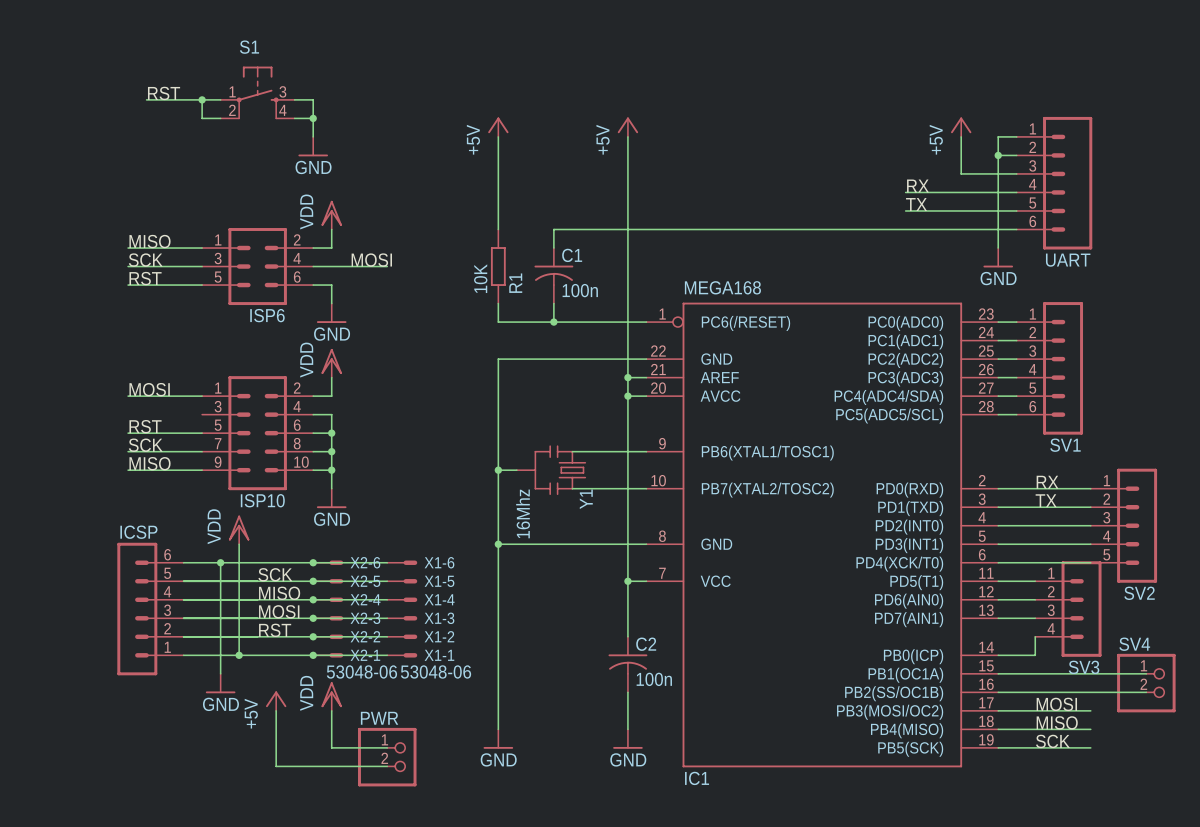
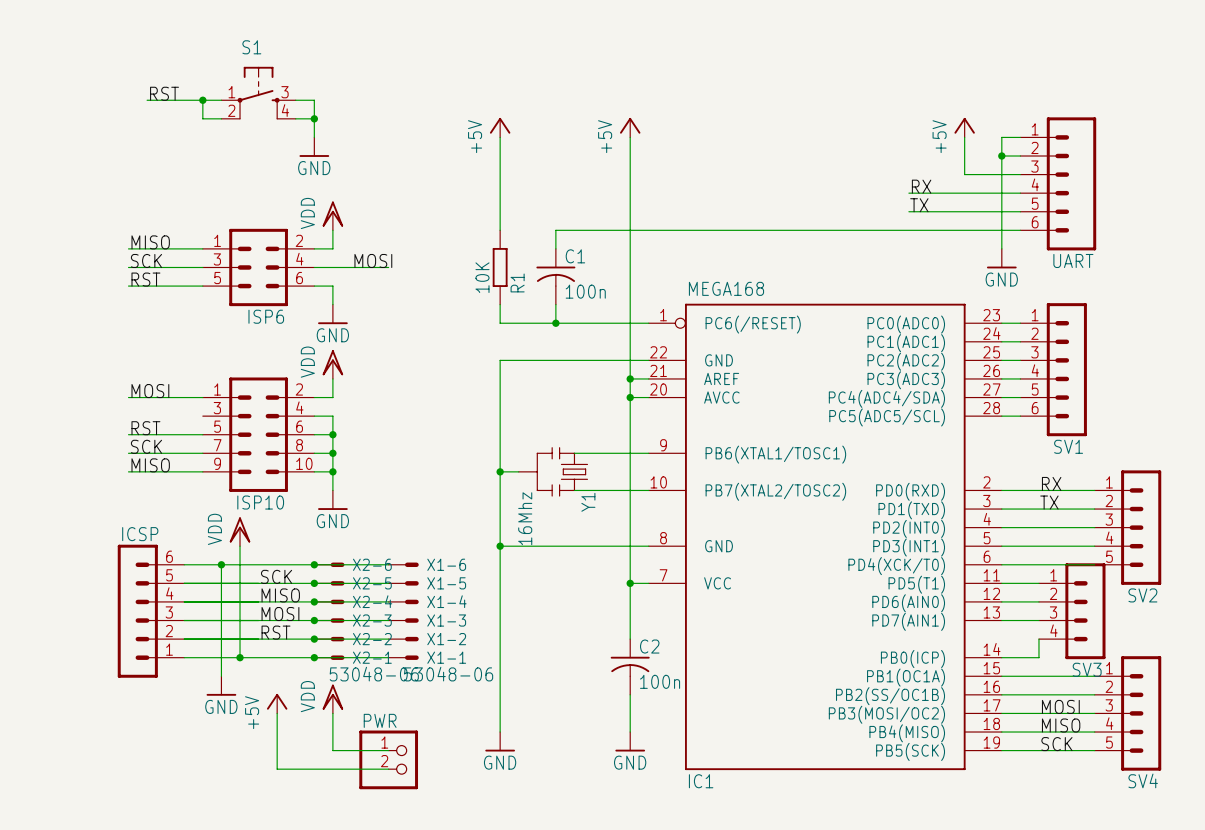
SV4 name position: SV4 (1134, 644) -> SV4 (1143, 780)
SV4 symbol: [1117, 653, 1176, 713] -> [1094, 656, 1162, 771]

